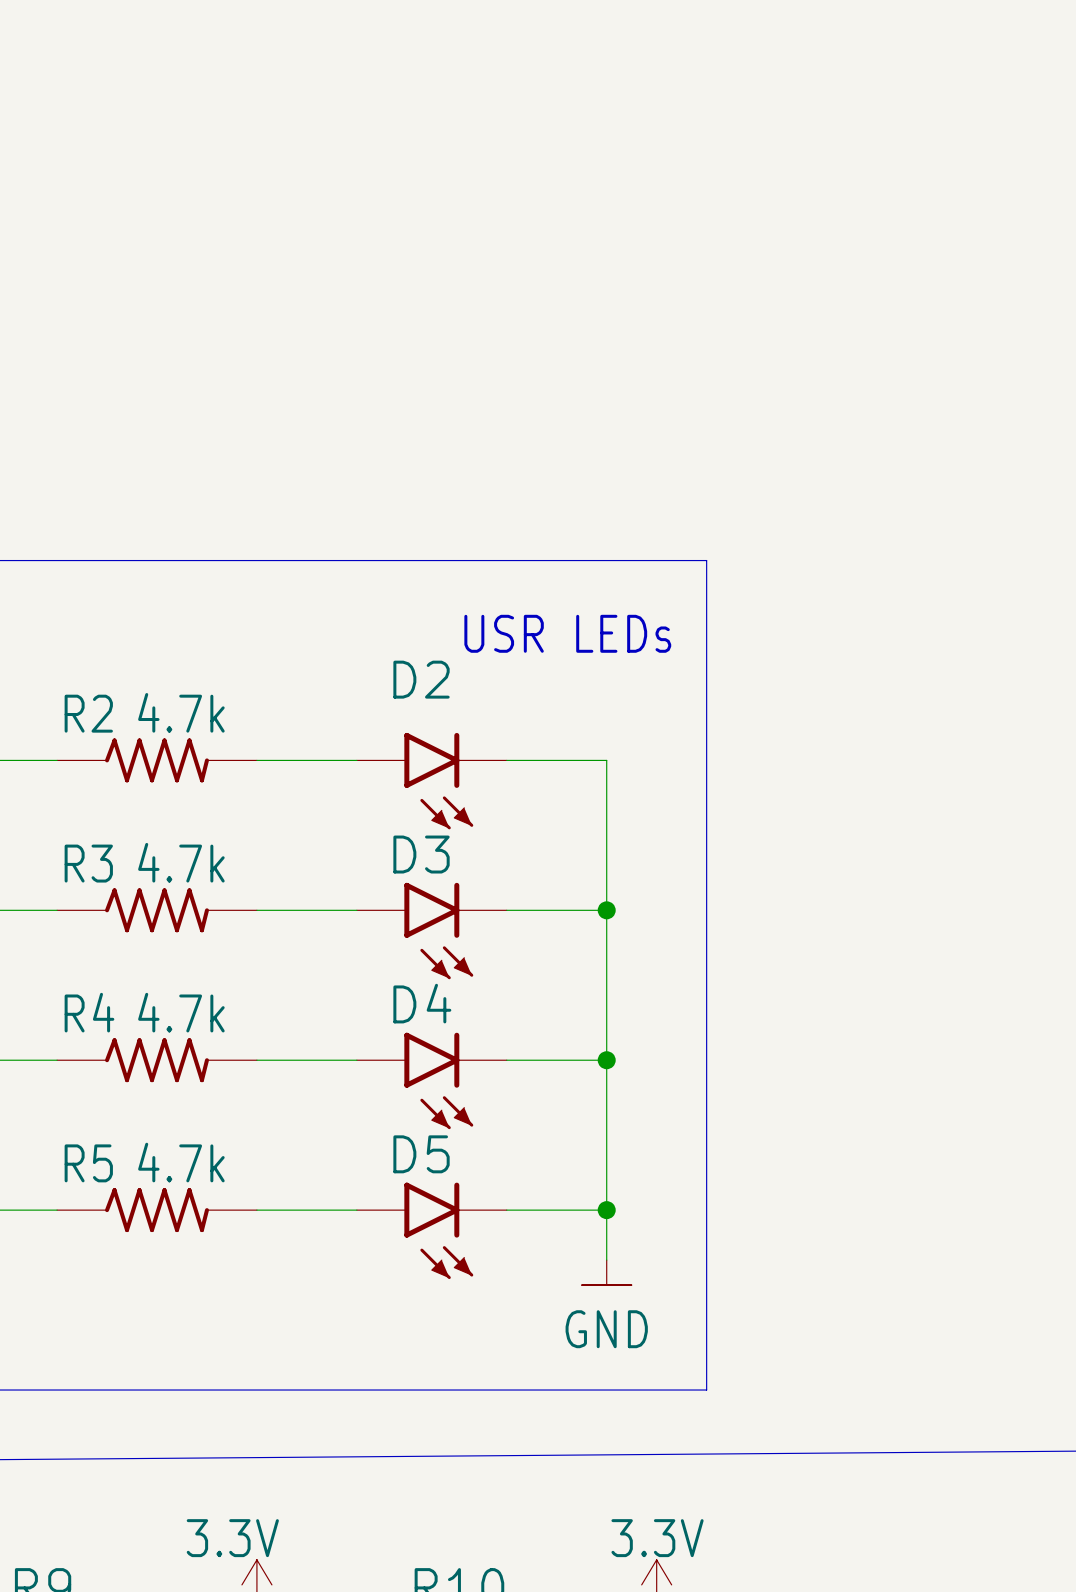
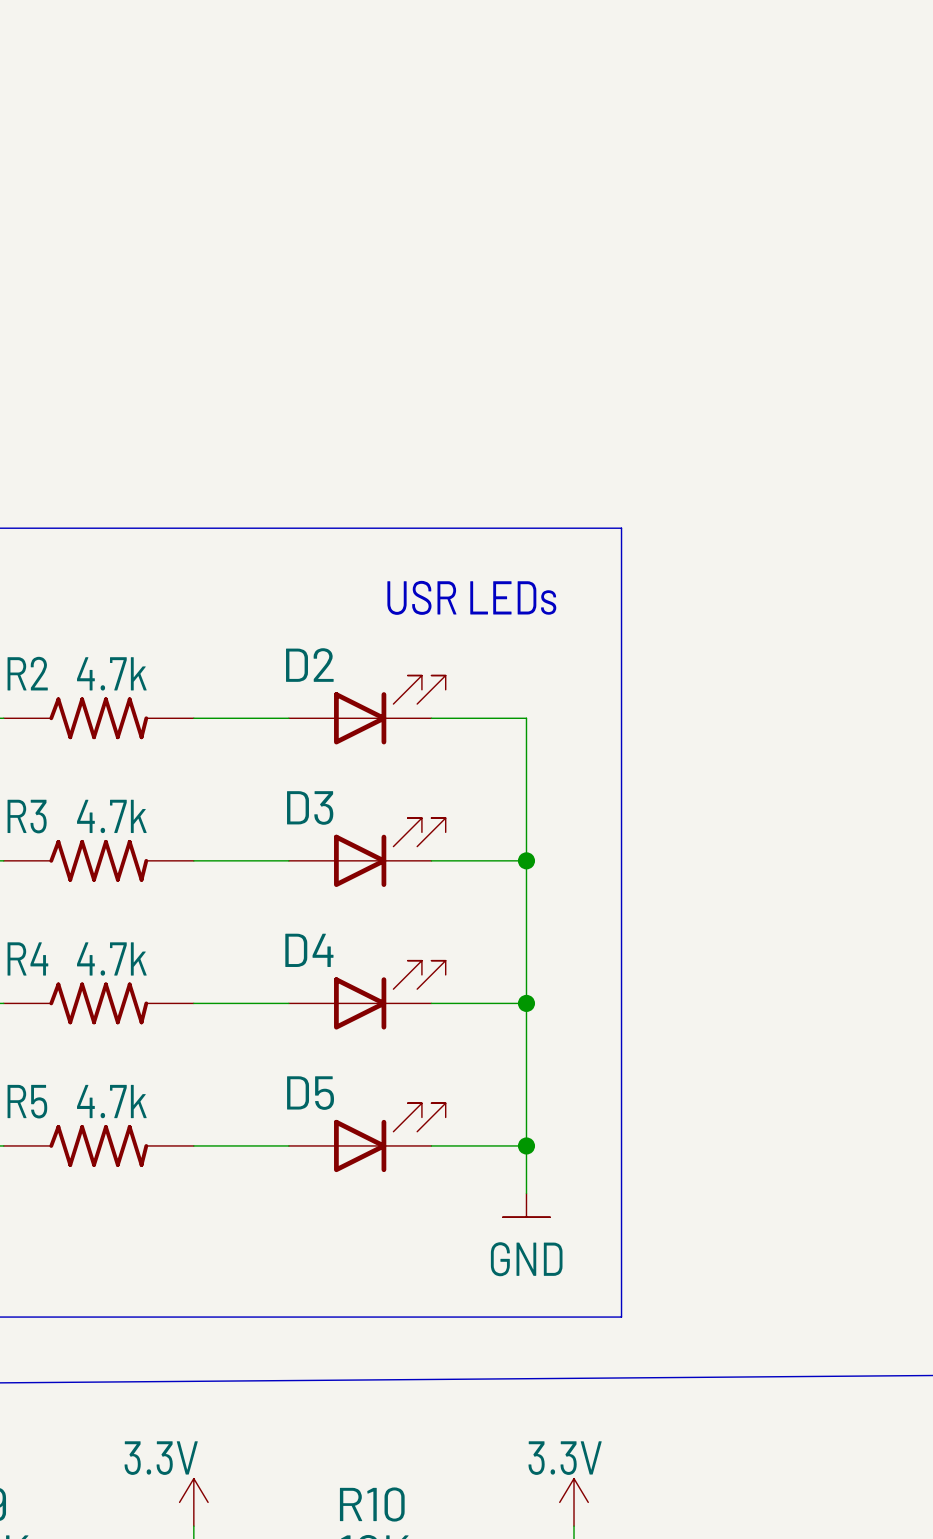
D2 name position: D2 (421, 679) -> D2 (309, 665)
D2 symbol: [356, 732, 507, 830] -> [288, 675, 446, 745]
D3 name position: D3 (421, 854) -> D3 (310, 807)
D3 symbol: [356, 882, 507, 980] -> [288, 818, 446, 887]
D4 name position: D4 (422, 1003) -> D4 (309, 950)
D4 symbol: [356, 1032, 507, 1130] -> [288, 960, 446, 1030]
D5 name position: D5 (421, 1154) -> D5 (310, 1093)
D5 symbol: [356, 1182, 507, 1280] -> [288, 1103, 446, 1173]

